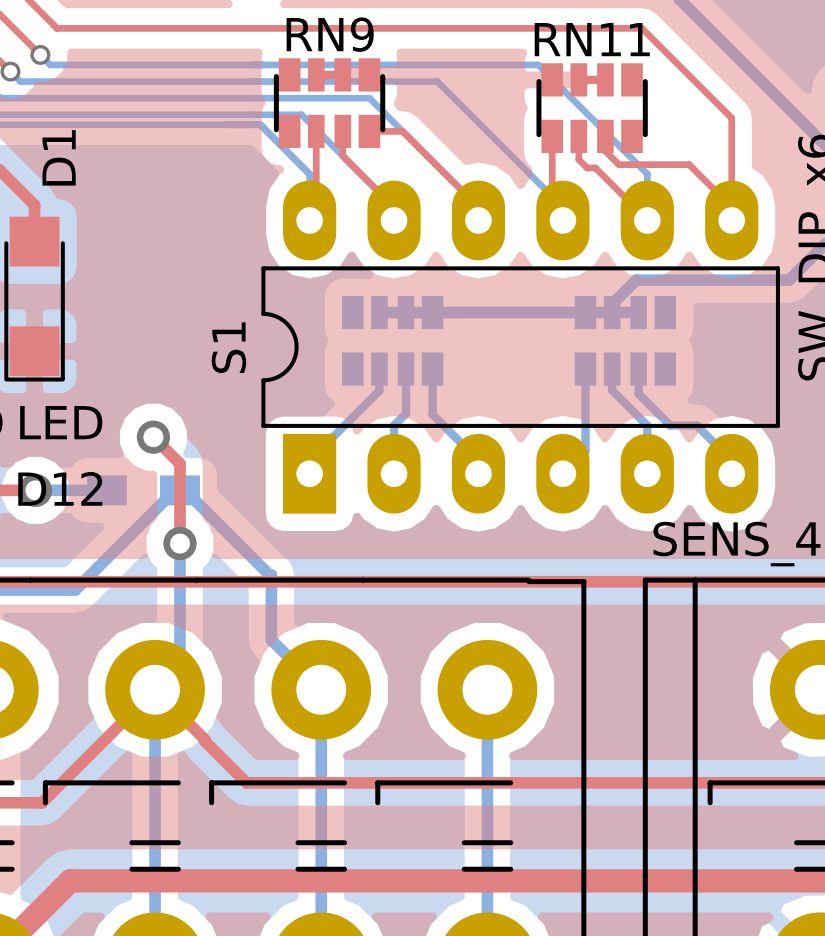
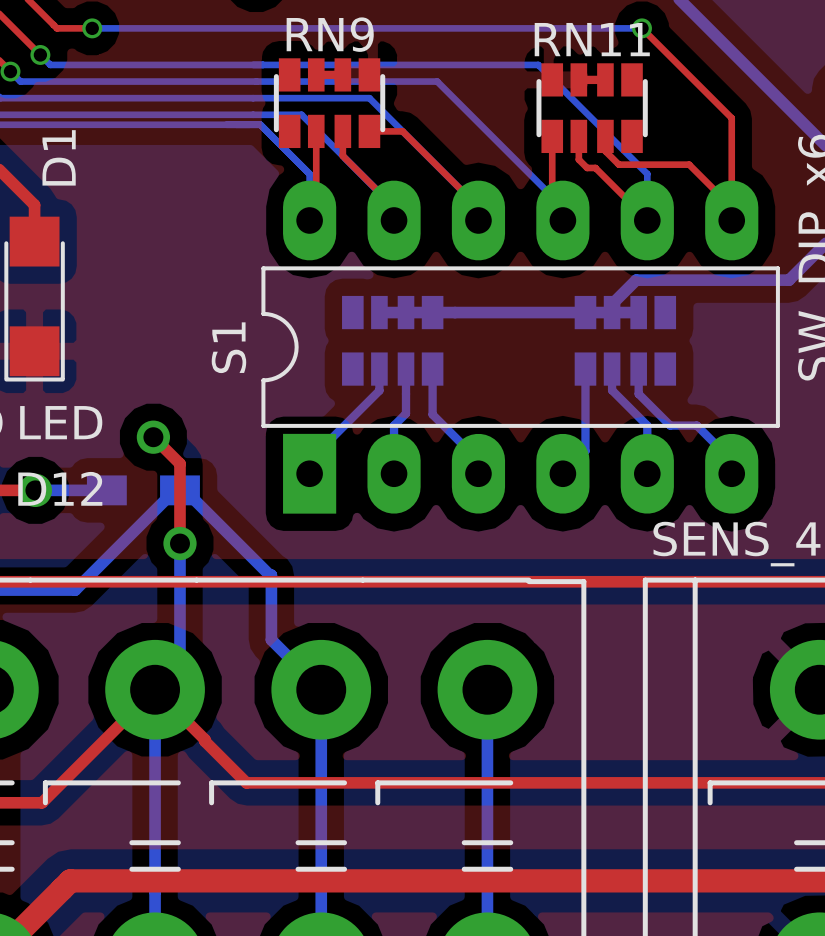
top track: (92, 28) (641, 28) -> none
bottom track: none -> (92, 28) (641, 28)
via: none -> (92, 28)
via: none -> (641, 28)

